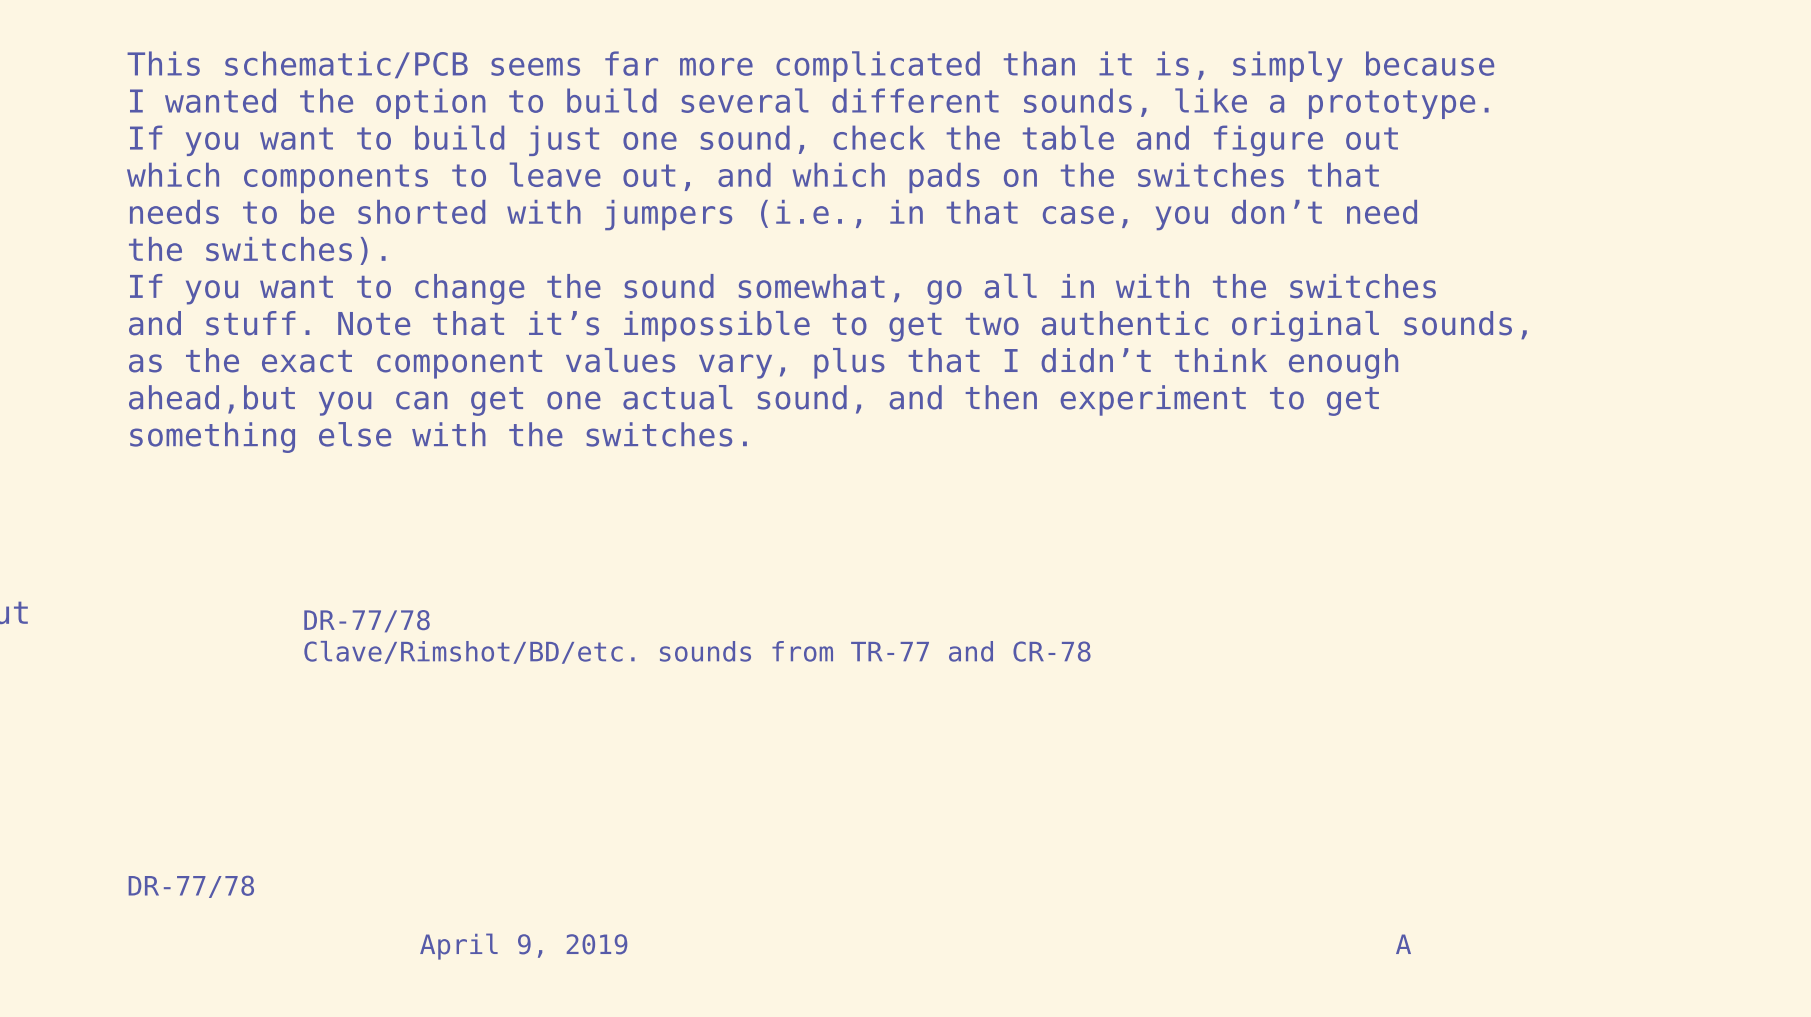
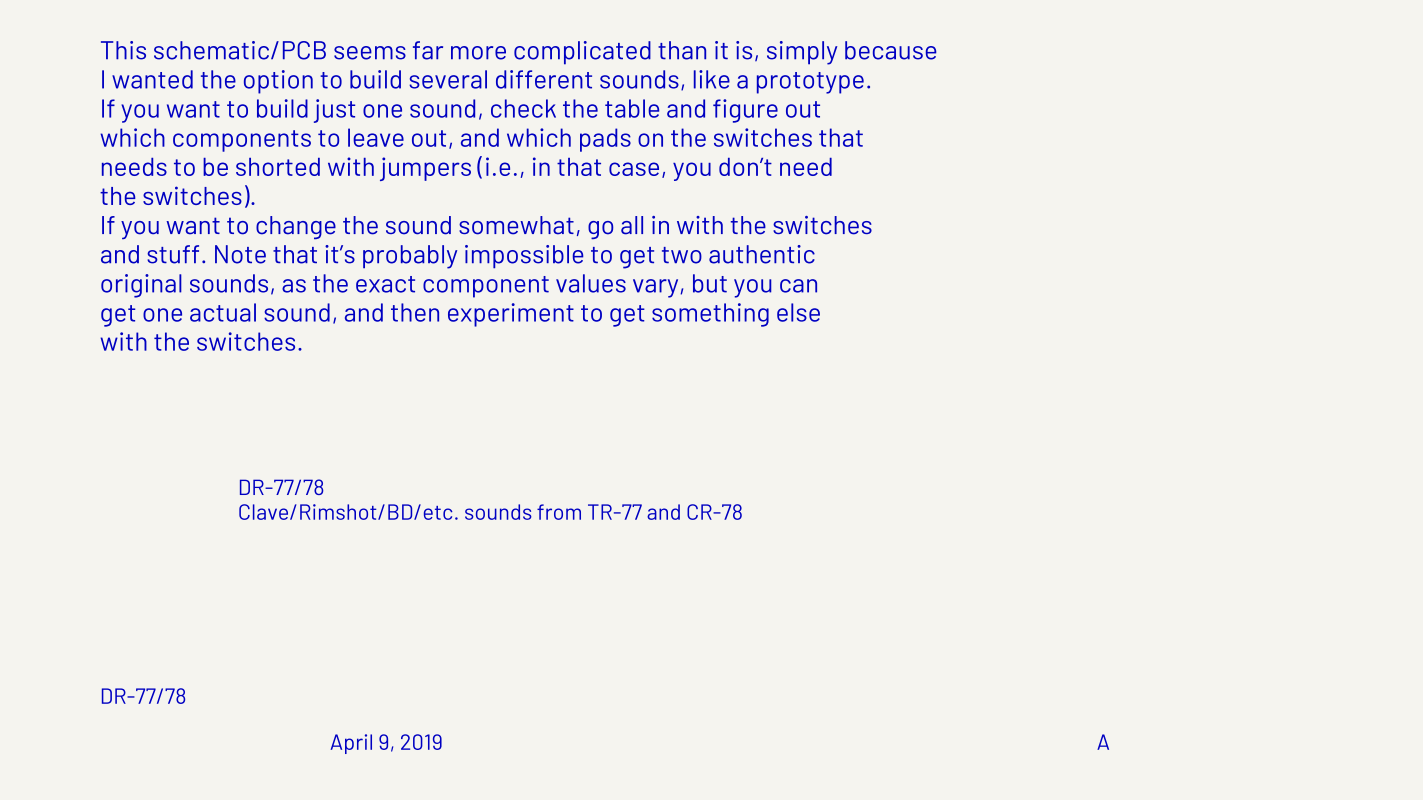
text: and stuff. Note that it’s impossible to get two authentic original sounds, (827, 326) -> and stuff. Note that it’s probably impossible to get two authentic (457, 256)
text: as the exact component values vary, plus that I didn’t think enough (763, 363) -> original sounds, as the exact component values vary, but you can (459, 285)
text: ahead,but you can get one actual sound, and then experiment to get (753, 400) -> get one actual sound, and then experiment to get something else (460, 314)
text: something else with the switches. (438, 437) -> with the switches. (200, 341)

